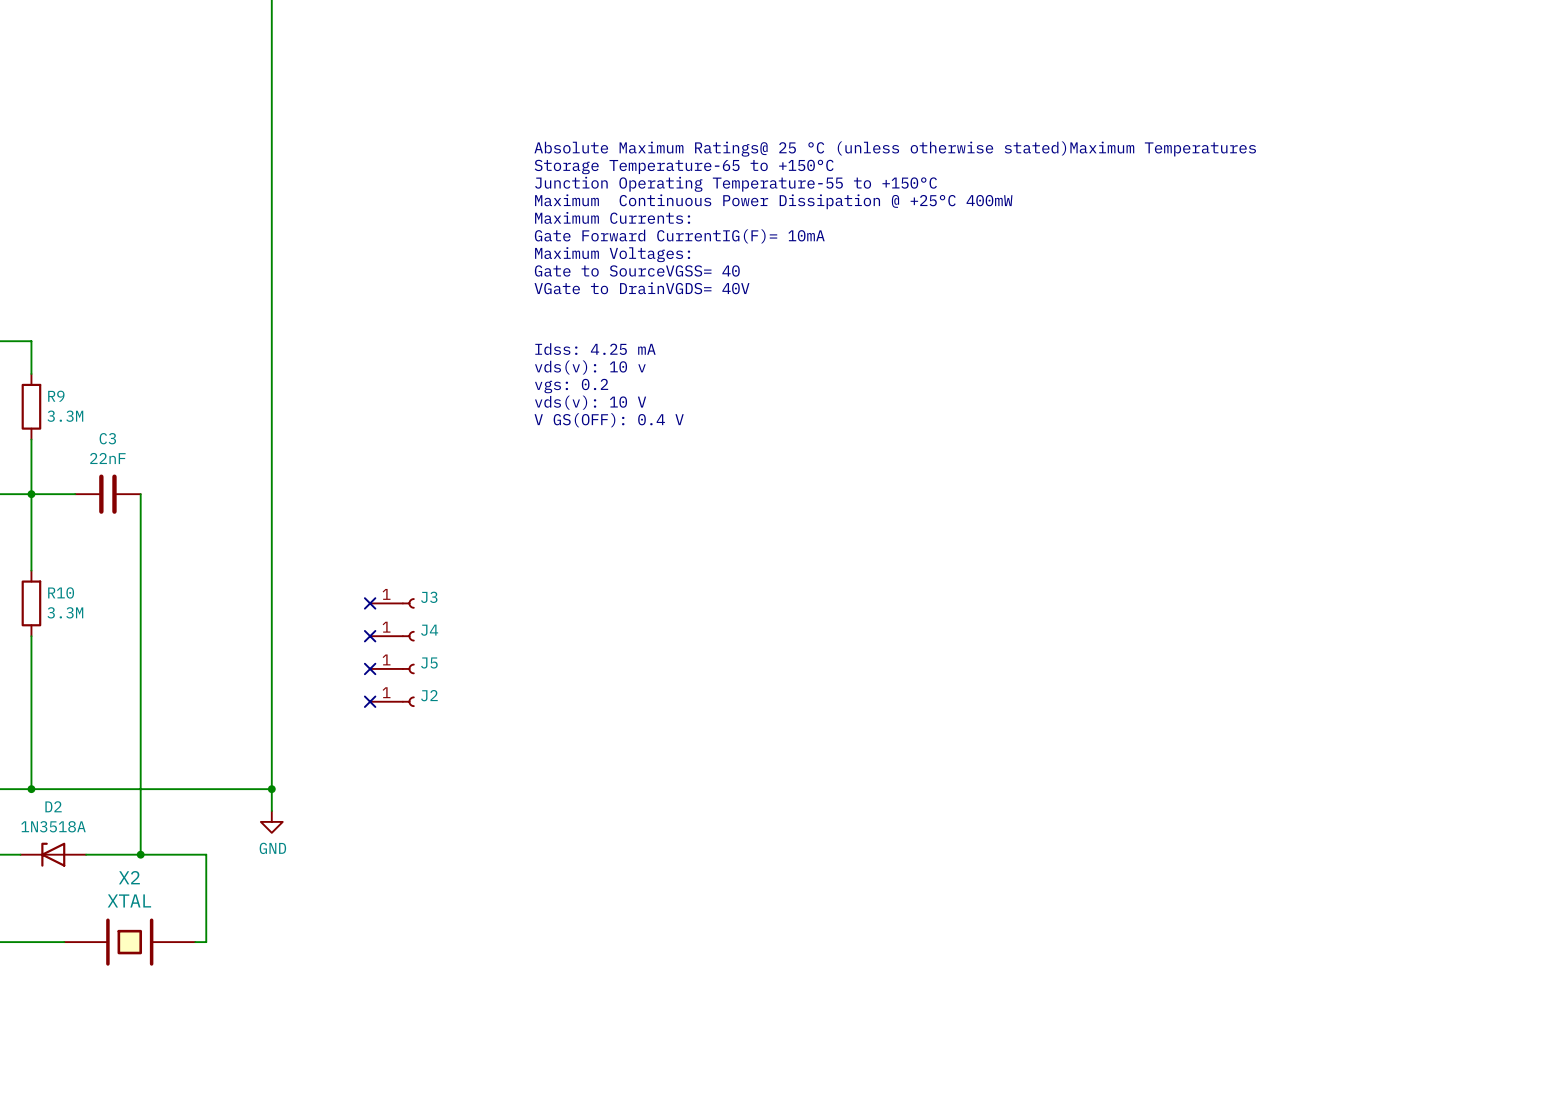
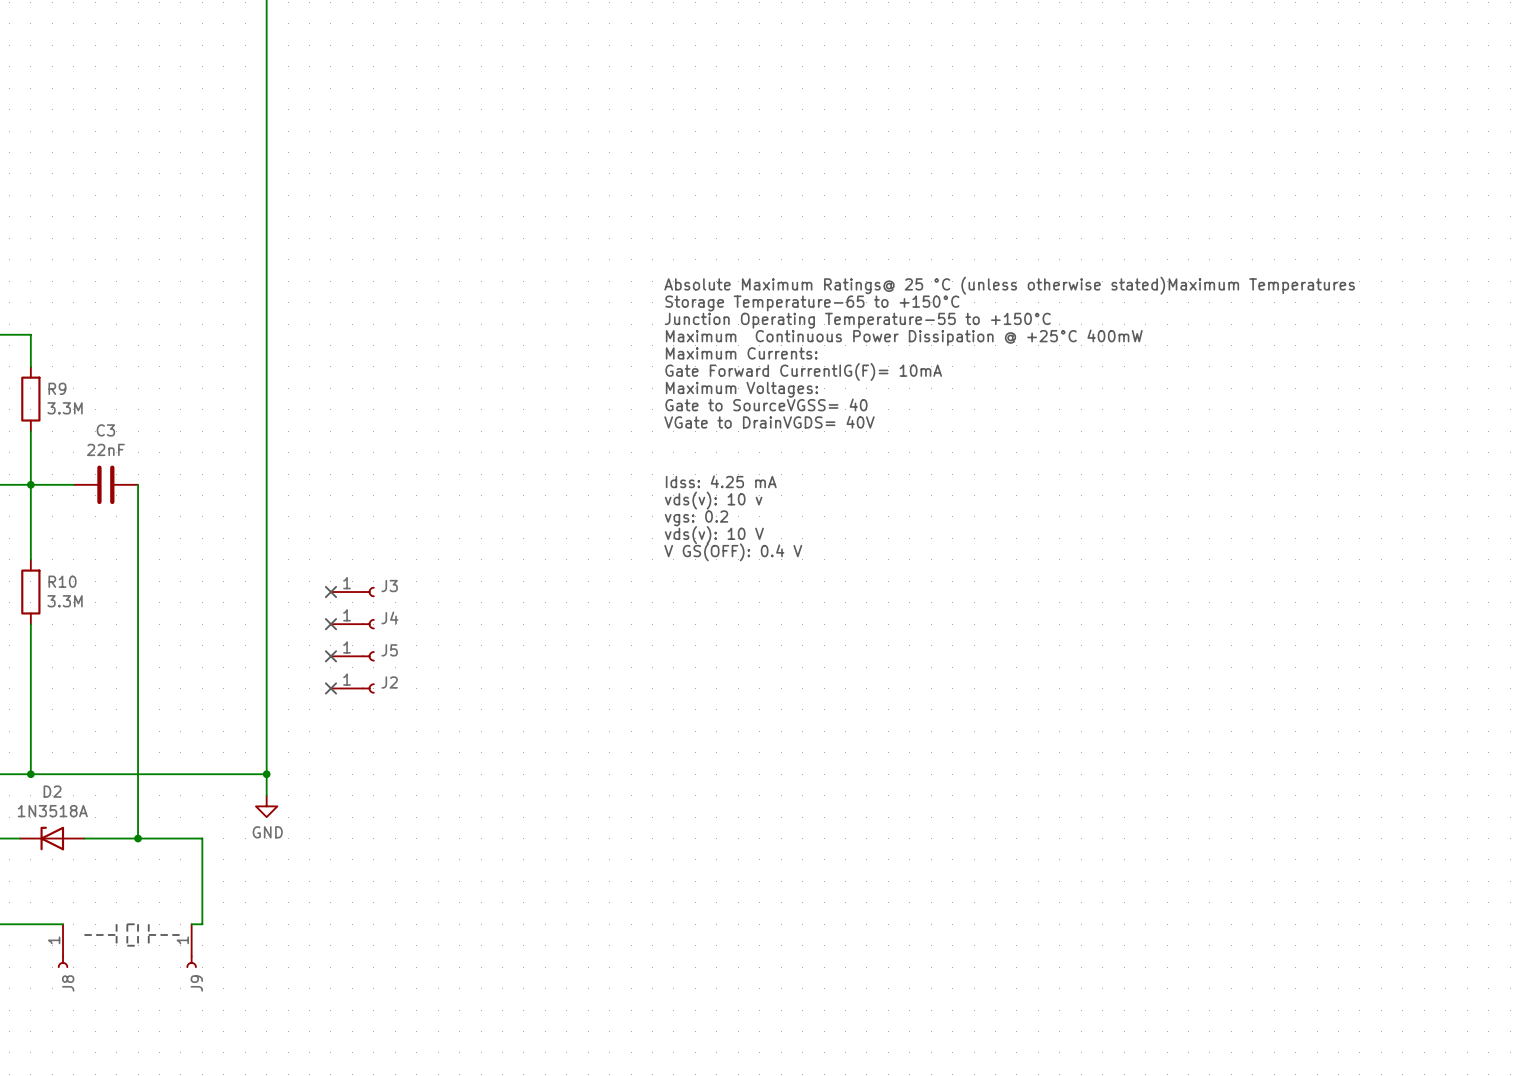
text position: Absolute Maximum Ratings@ 25 °C (unless otherwise stated)Maximum Temperatures (895, 149) -> Absolute Maximum Ratings@ 25 °C (unless otherwise stated)Maximum Temperatures (1009, 285)
text position: Storage Temperature-65 to +150°C (684, 167) -> Storage Temperature-65 to +150°C (812, 303)
text position: Junction Operating Temperature-55 to +150°C (736, 184) -> Junction Operating Temperature-55 to +150°C (857, 320)
text position: Maximum Continuous Power Dissipation @ +25°C 400mW (773, 201) -> Maximum Continuous Power Dissipation @ +25°C 400mW (904, 337)
text position: Maximum Currents: (612, 217) -> Maximum Currents: (741, 353)
text position: Gate Forward CurrentIG(F)= 10mA (679, 236) -> Gate Forward CurrentIG(F)= 10mA (803, 371)
text position: Maximum Voltages: (612, 254) -> Maximum Voltages: (741, 389)
text position: Gate to SourceVGSS= 40 (637, 270) -> Gate to SourceVGSS= 40 (766, 404)
text position: VGate to DrainVGDS= 40V (642, 288) -> VGate to DrainVGDS= 40V (769, 422)
text position: Idss: 4.25 mA (595, 349) -> Idss: 4.25 mA (721, 481)
text position: vds(v): 10 v (590, 367) -> vds(v): 10 v (713, 500)
text position: vgs: 0.2 (571, 386) -> vgs: 0.2 (696, 518)
text position: vds(v): 10 V (590, 402) -> vds(v): 10 V (714, 535)
text position: V GS(OFF): 0.4 V (609, 420) -> V GS(OFF): 0.4 V (733, 552)
no-connect mark: none -> (330, 592)
no-connect mark: (370, 603) -> none
J3 position: (392, 603) -> (352, 592)
no-connect mark: none -> (330, 624)
no-connect mark: (370, 636) -> none
J4 position: (392, 636) -> (352, 624)
no-connect mark: none -> (330, 656)
no-connect mark: (370, 668) -> none
J5 position: (392, 668) -> (352, 656)
no-connect mark: none -> (330, 688)
no-connect mark: (370, 701) -> none
J2 position: (392, 701) -> (352, 688)
line: none -> (116, 924) (116, 945)
line: none -> (127, 924) (138, 924) (138, 945) (127, 945) (127, 924)
X2: XTAL (129, 942) -> none
line: none -> (148, 924) (148, 945)
line: none -> (84, 935) (116, 935)
line: none -> (148, 935) (180, 935)
J8: none -> (63, 946)
J9: none -> (191, 946)

